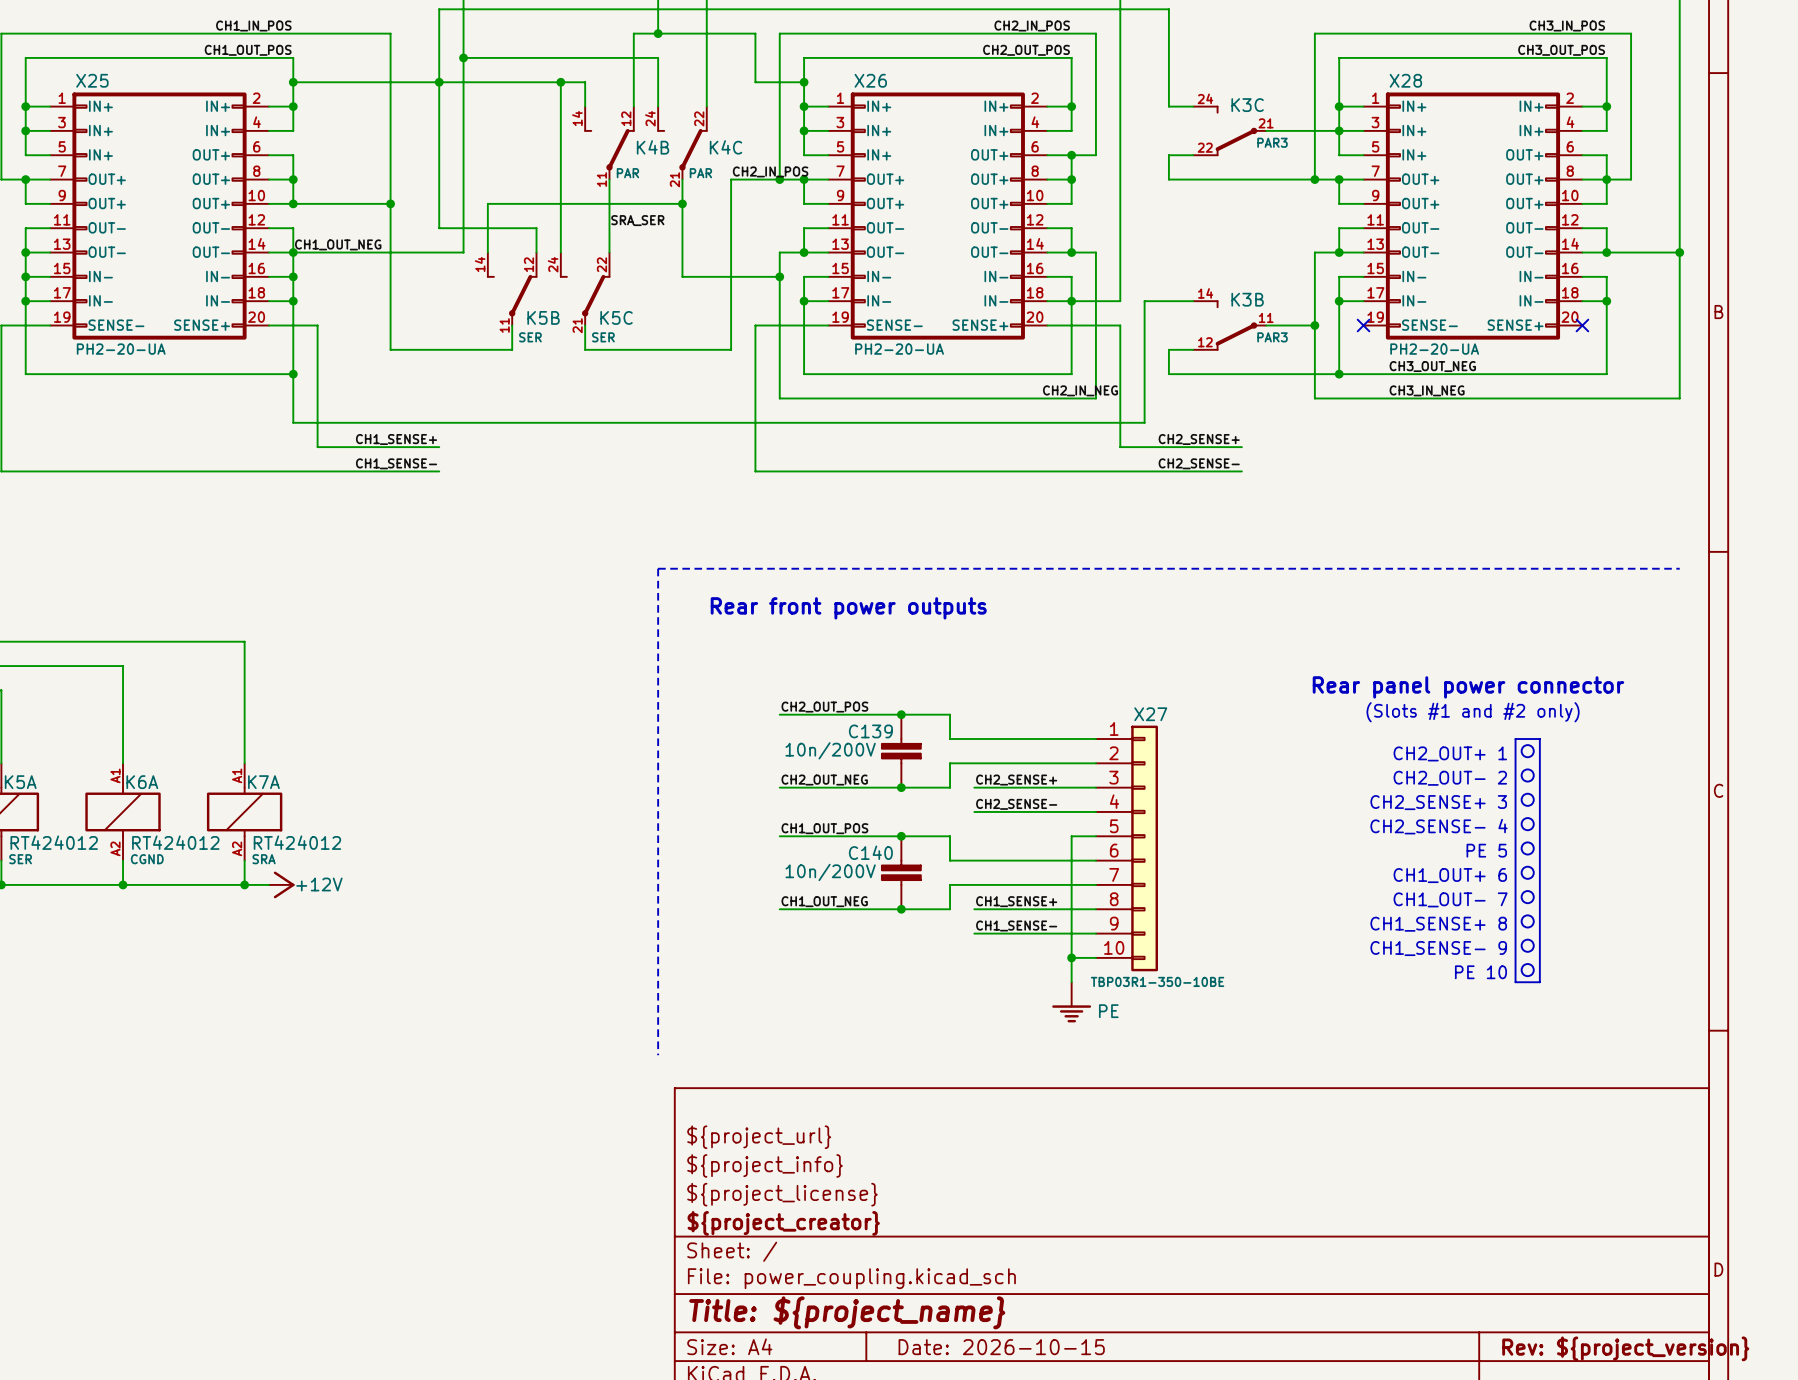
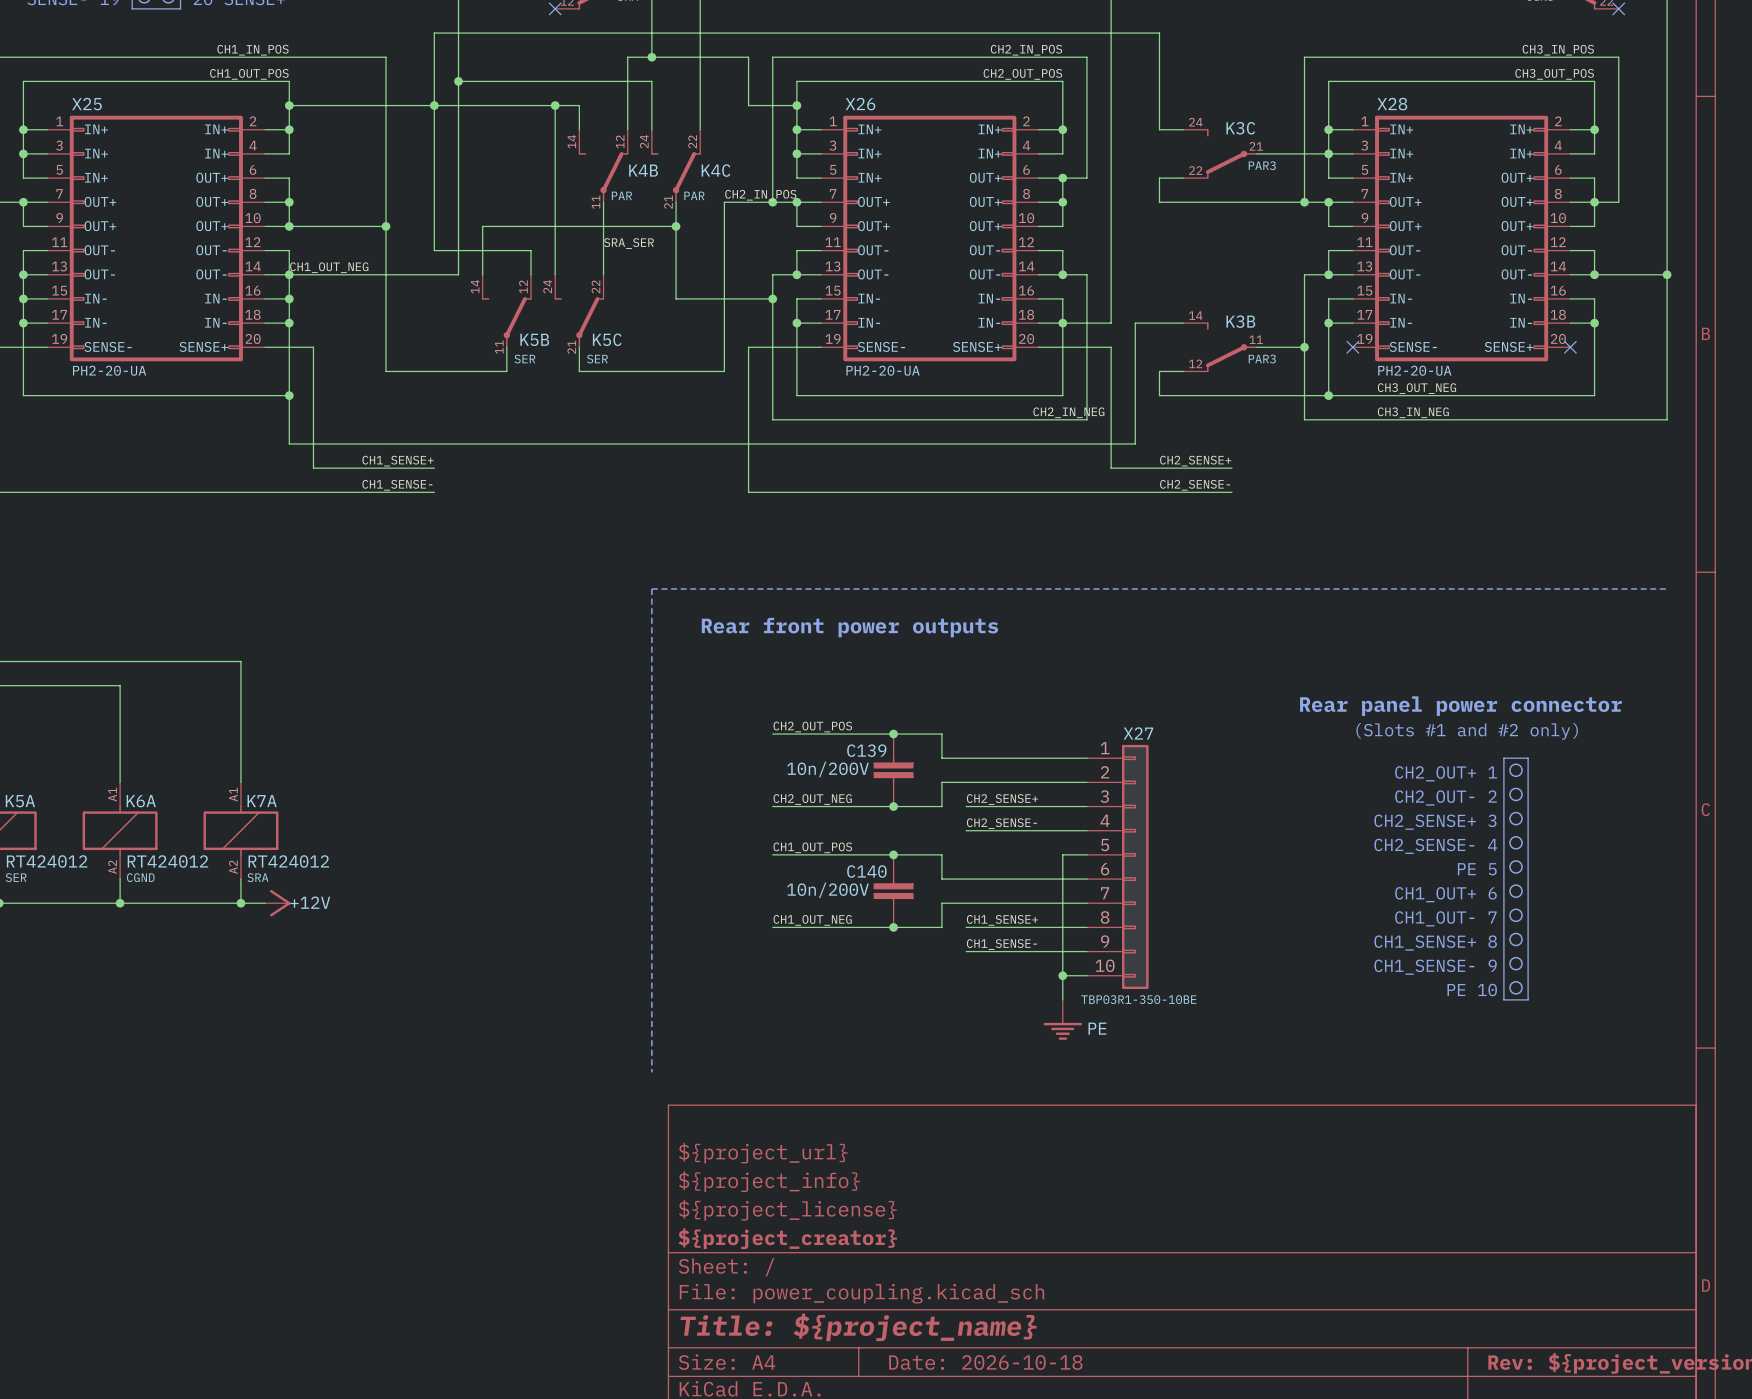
title block: Date: 2026-10-15 (1001, 1347) -> Date: 2026-10-18 (985, 1362)

